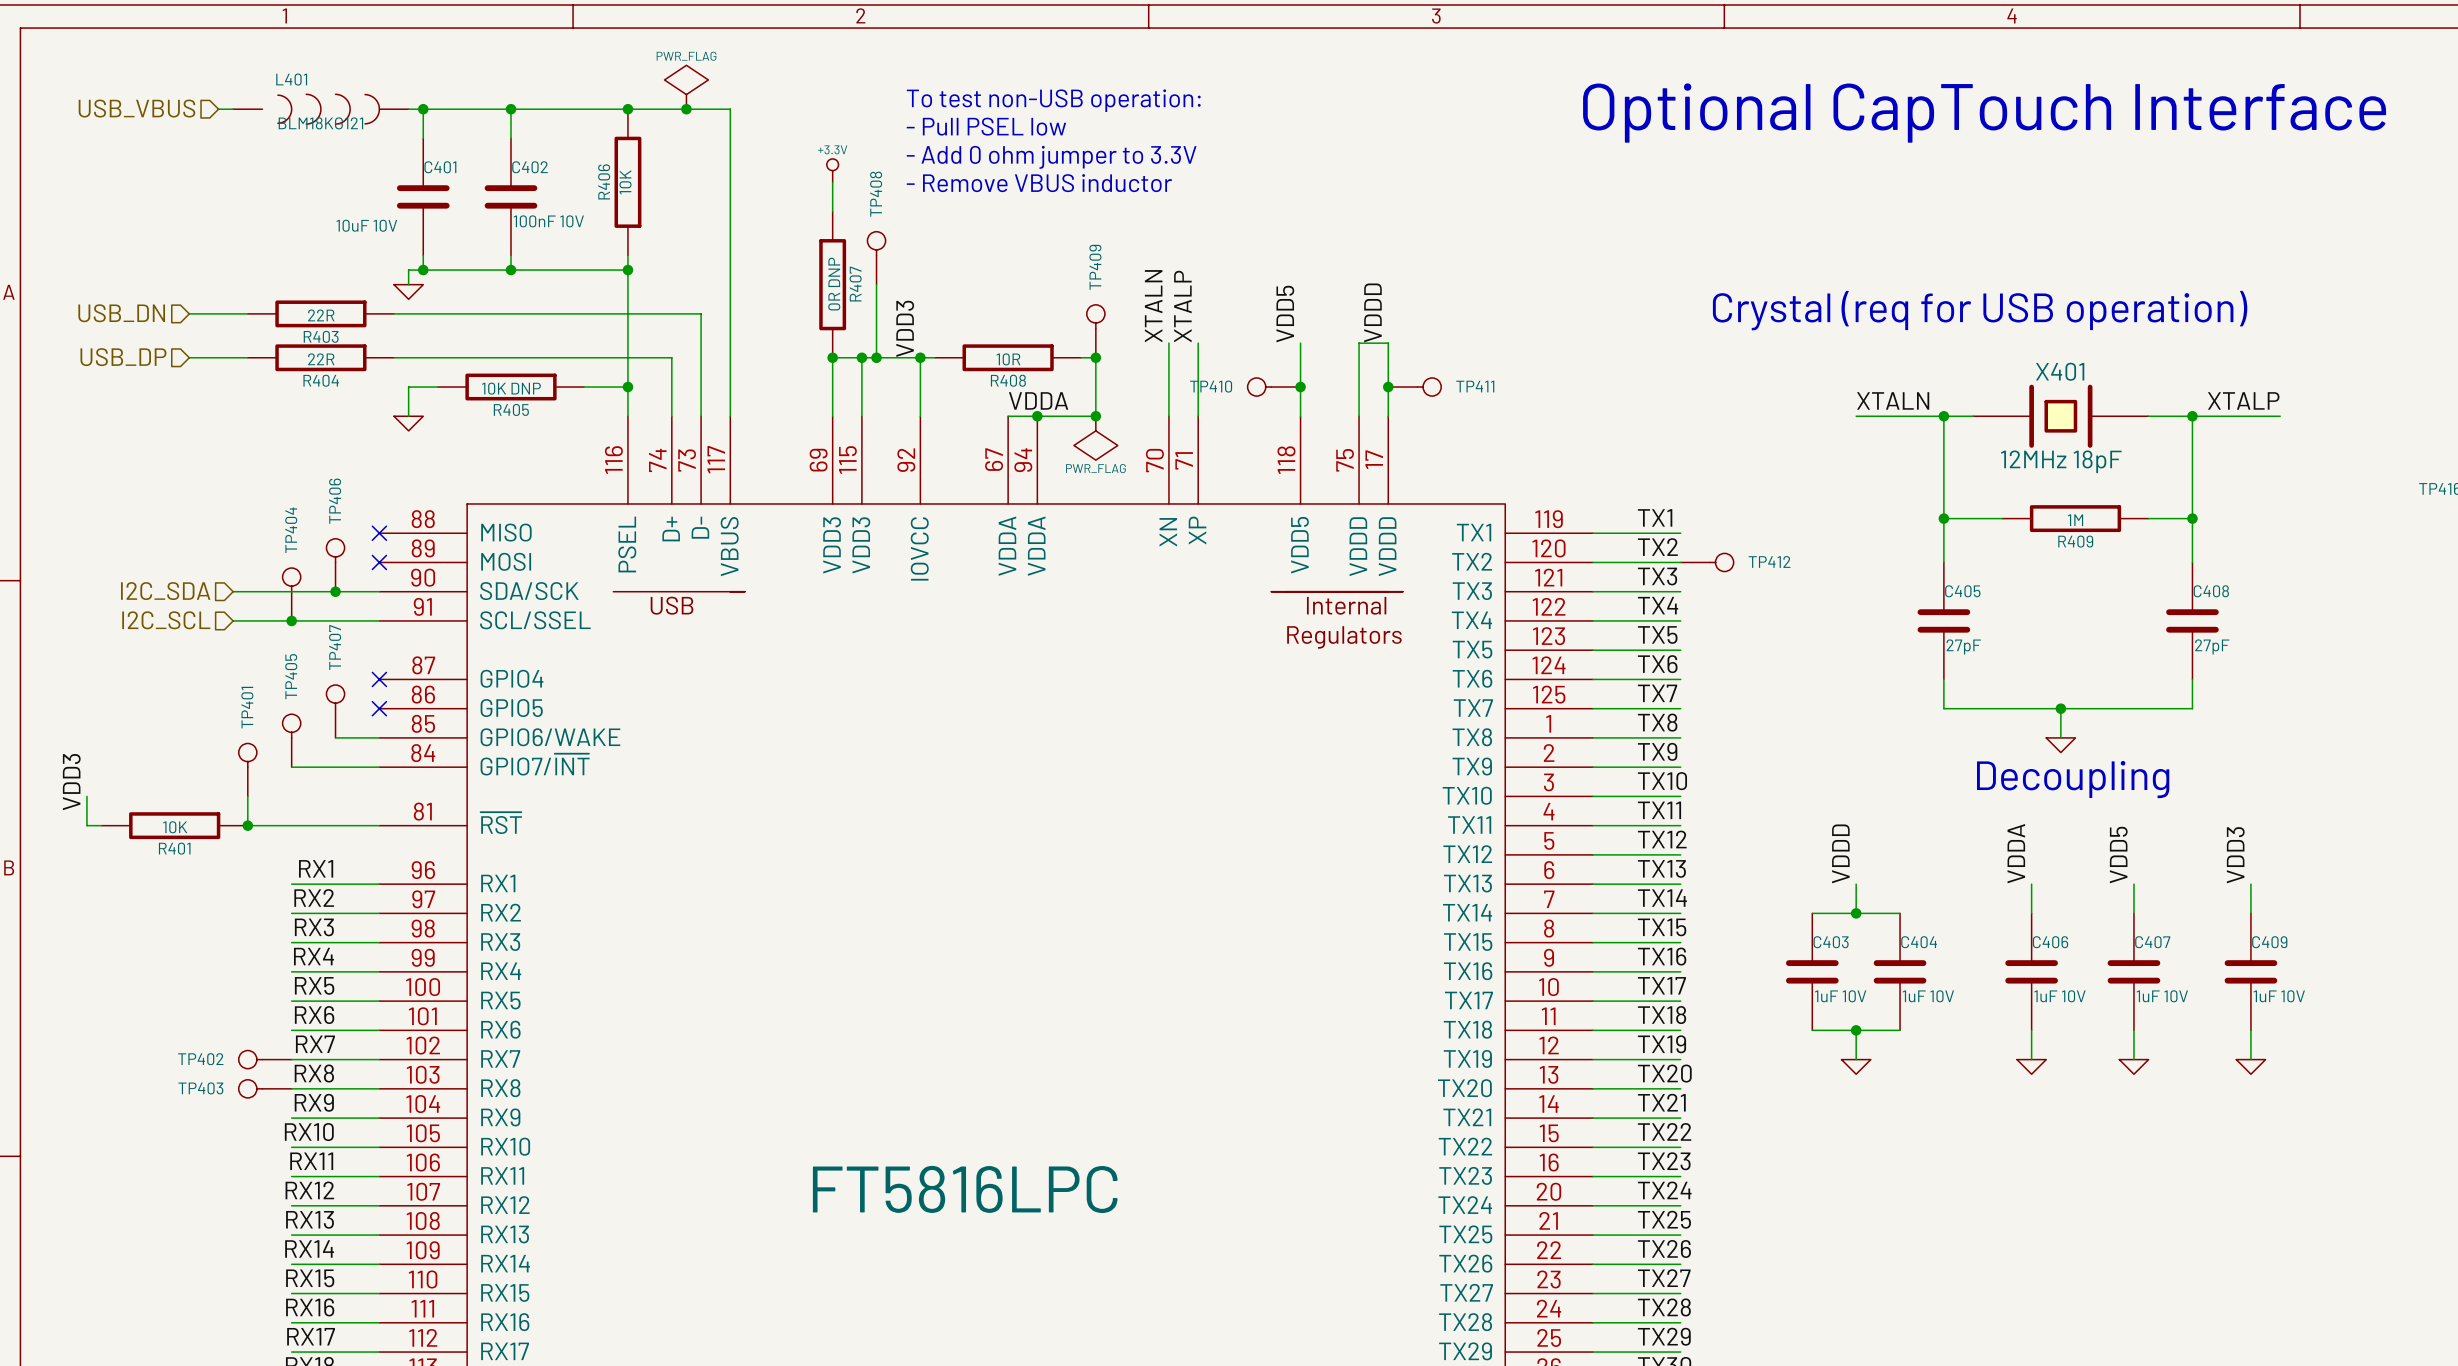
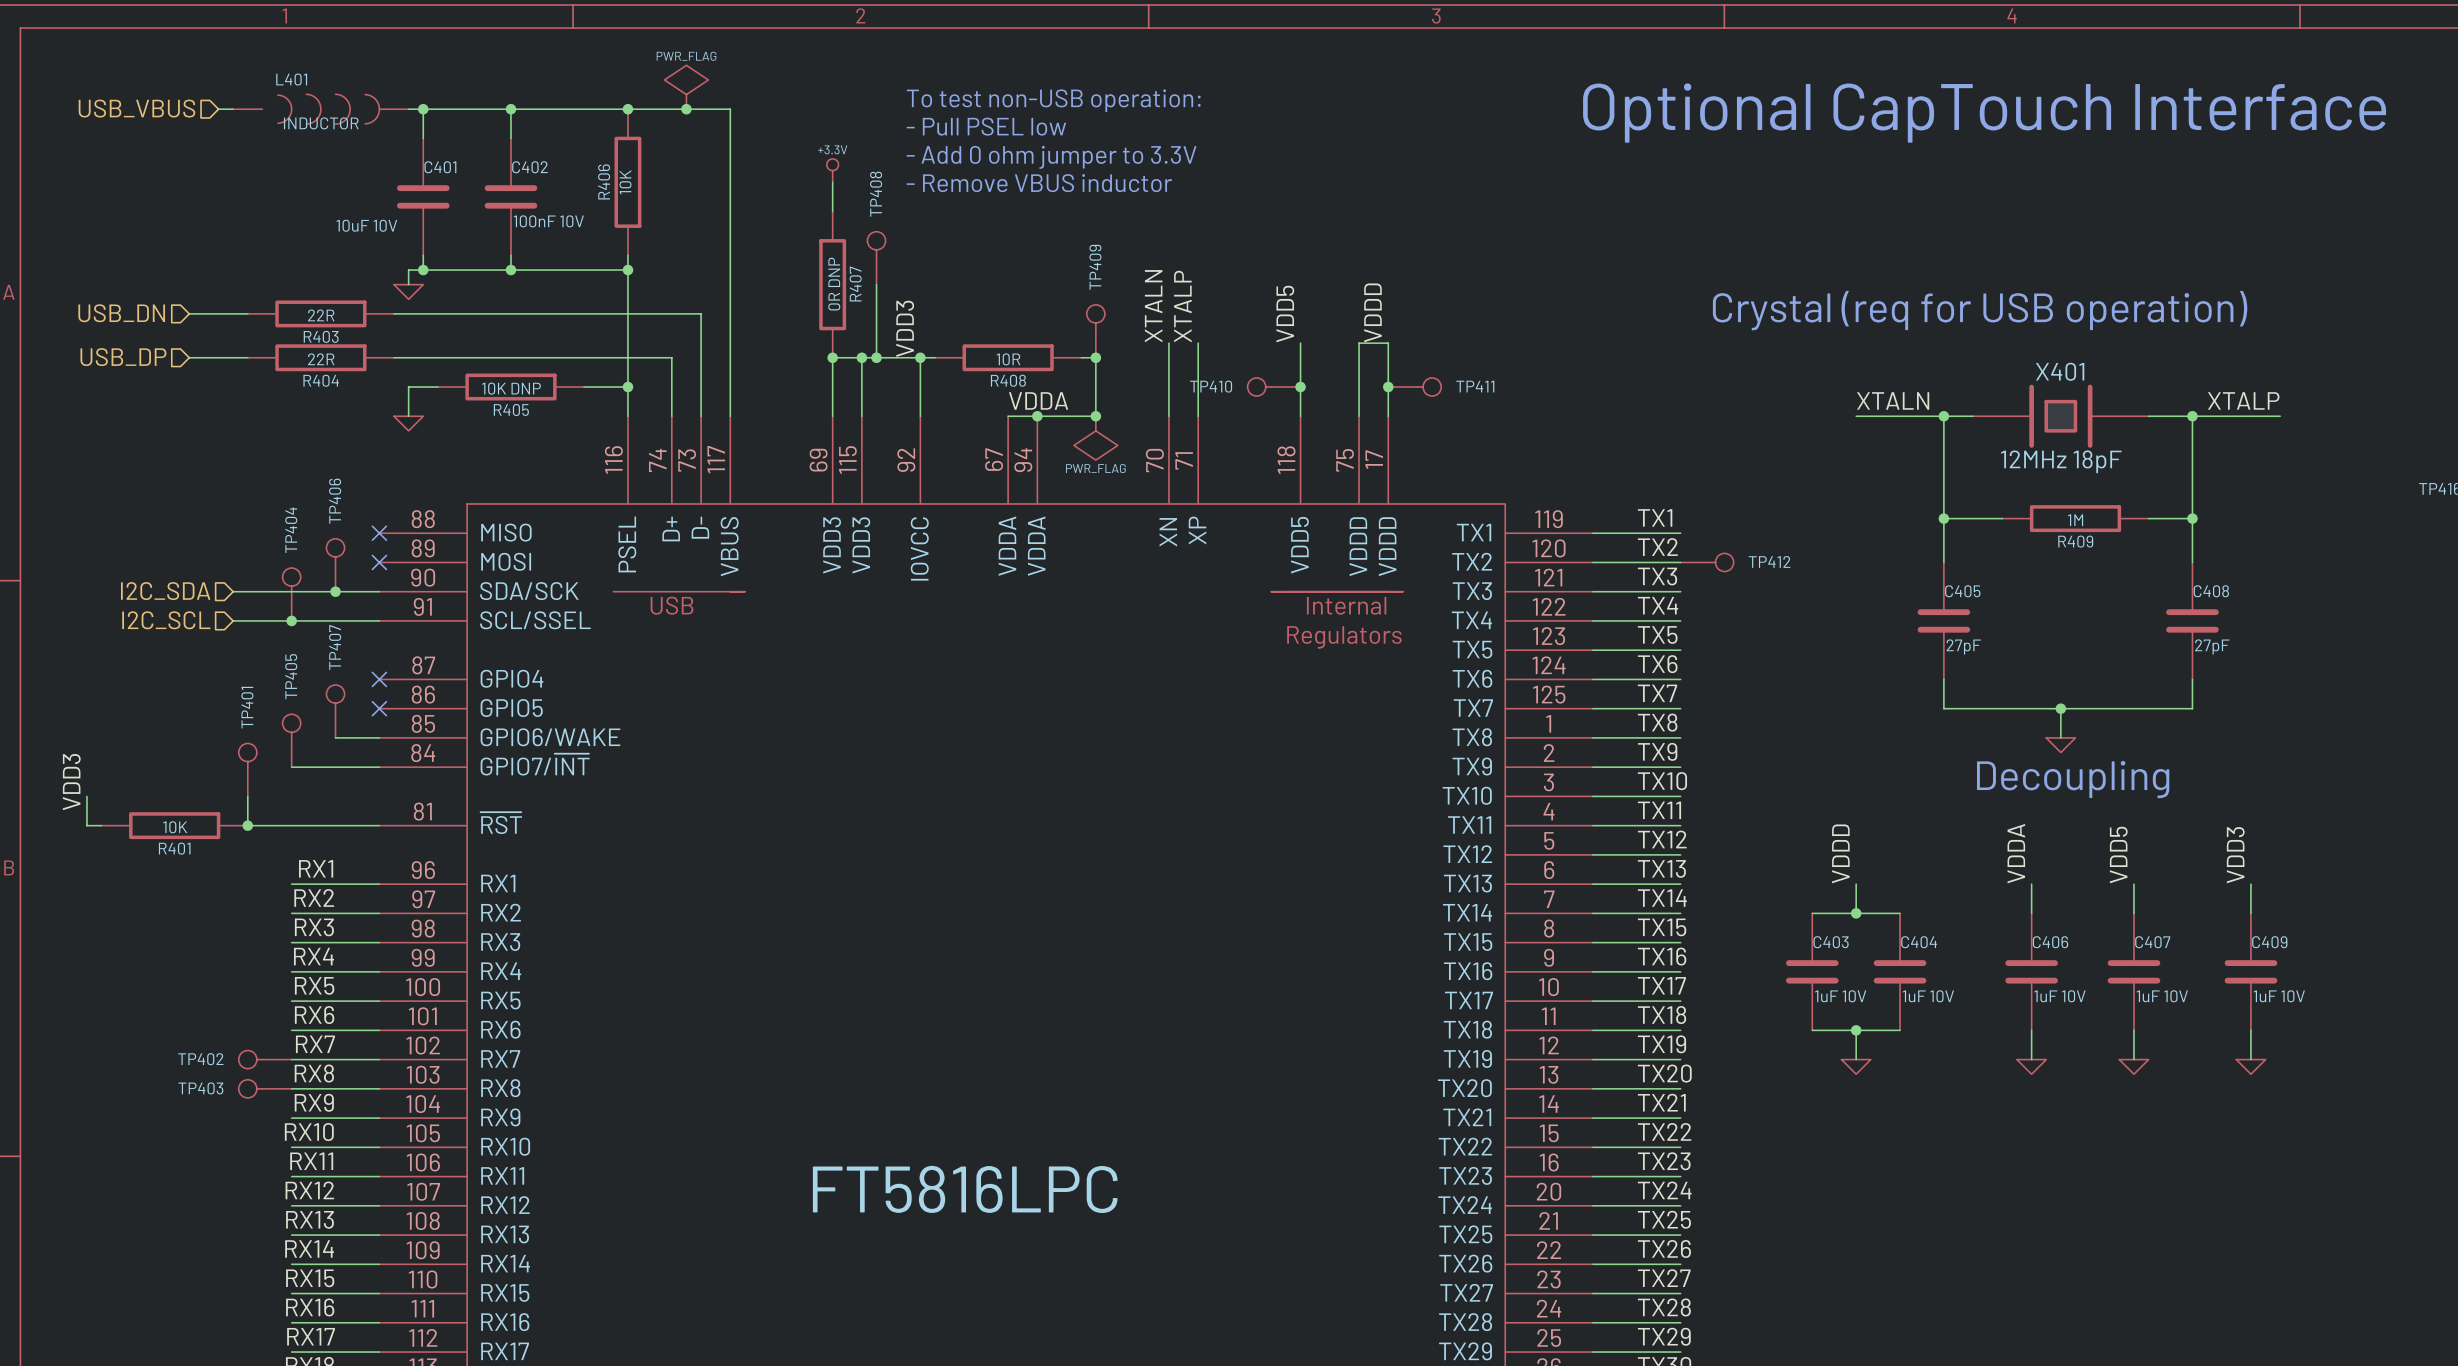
L401 value: BLM18KG121 (320, 123) -> INDUCTOR (321, 123)

